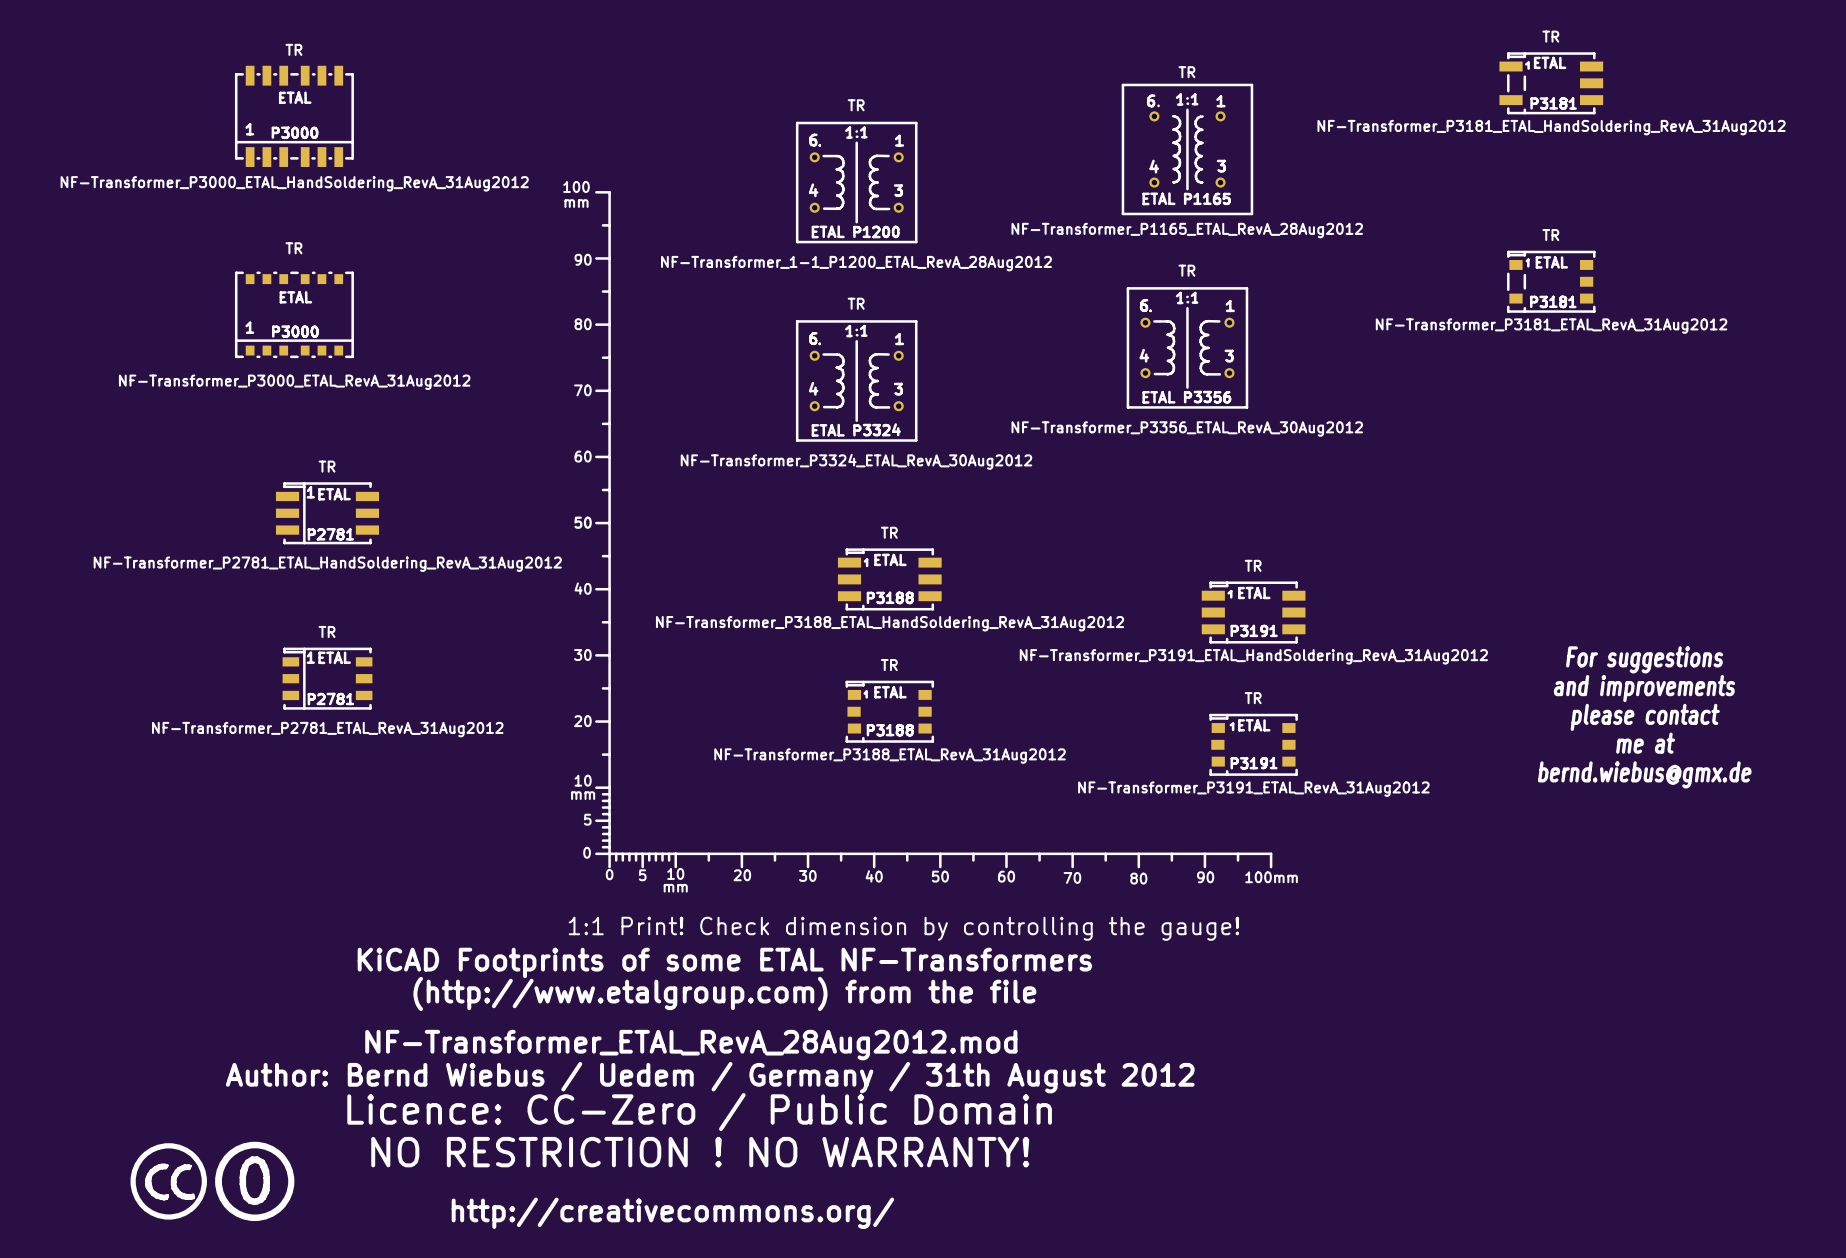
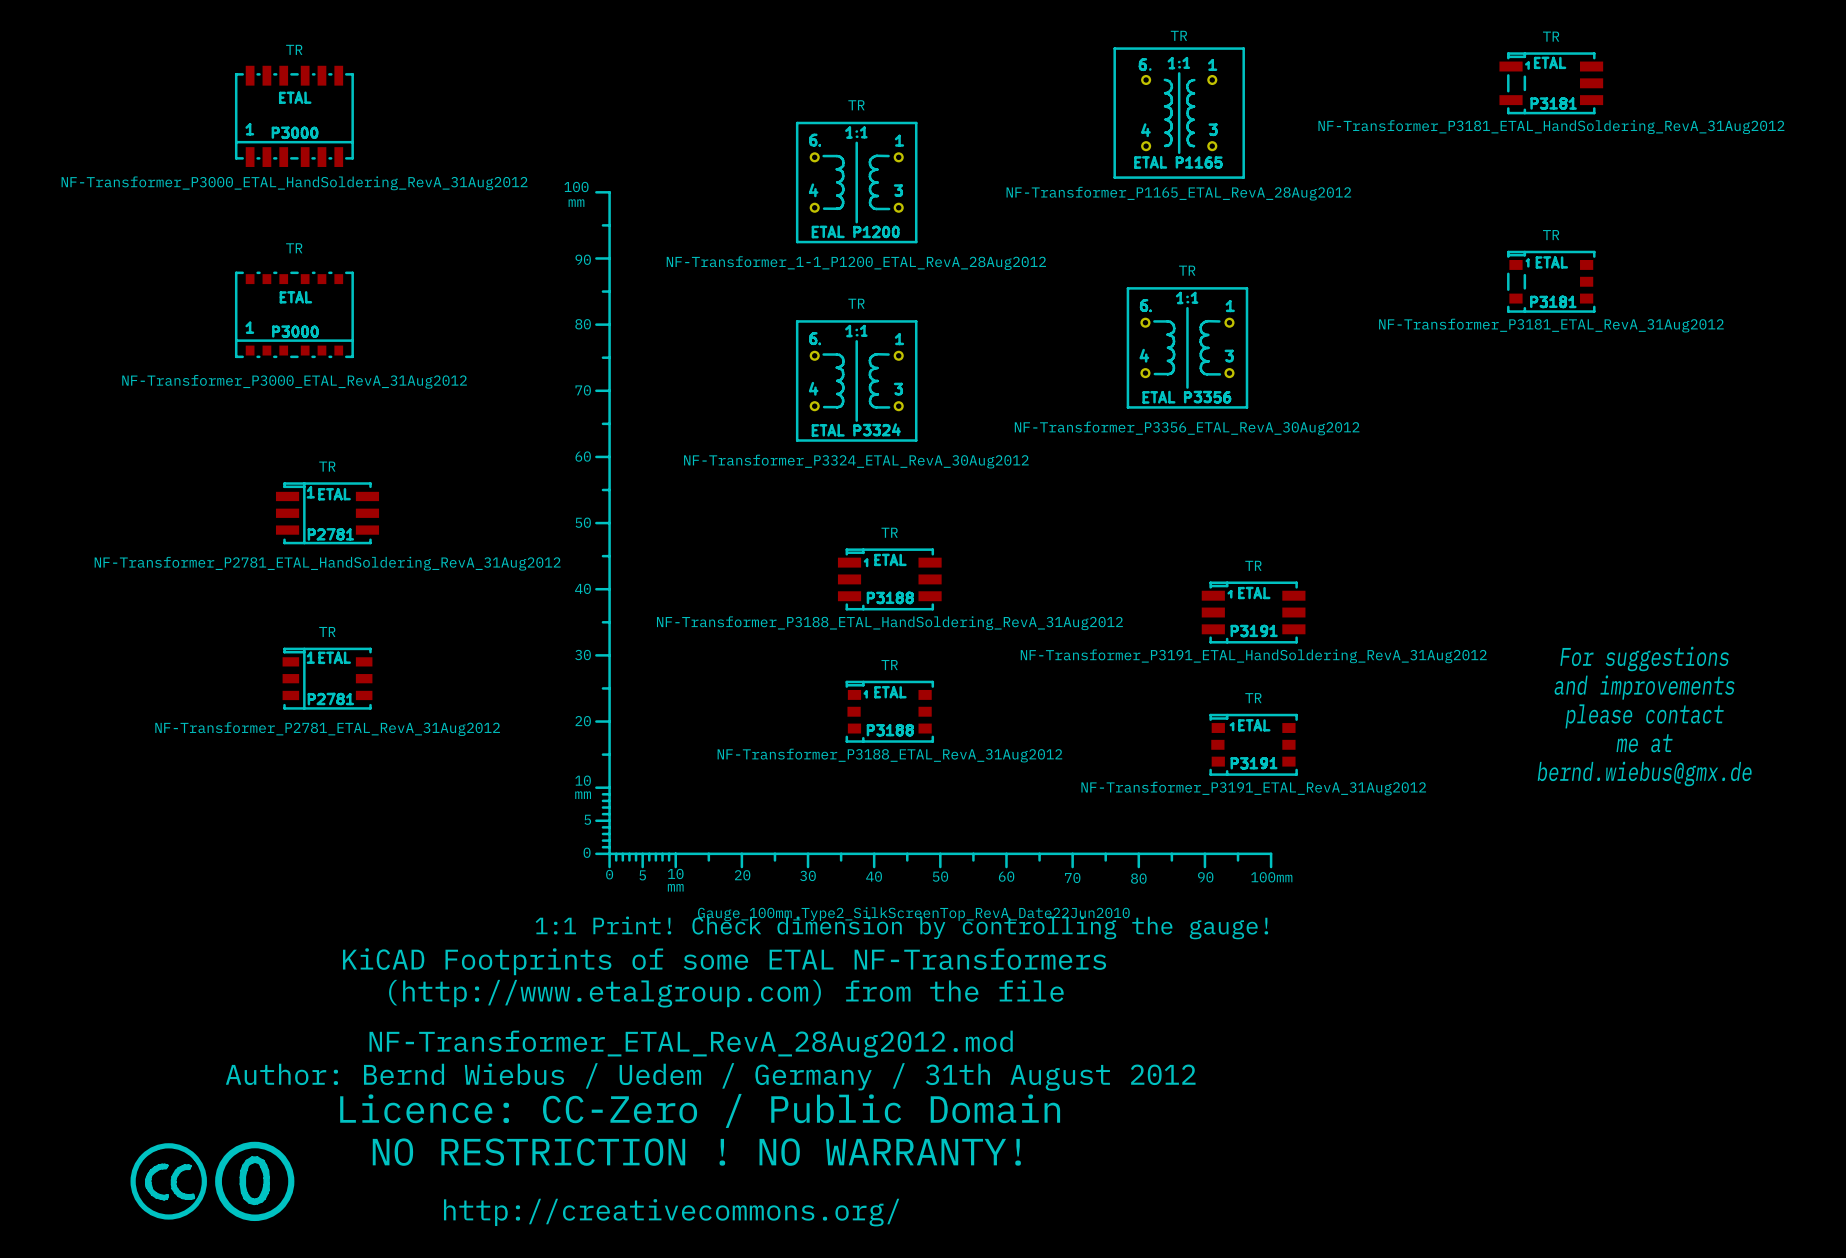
TR position: (1187, 149) -> (1179, 113)
drawing shape: [563, 181, 1298, 893] -> [564, 181, 1293, 922]

